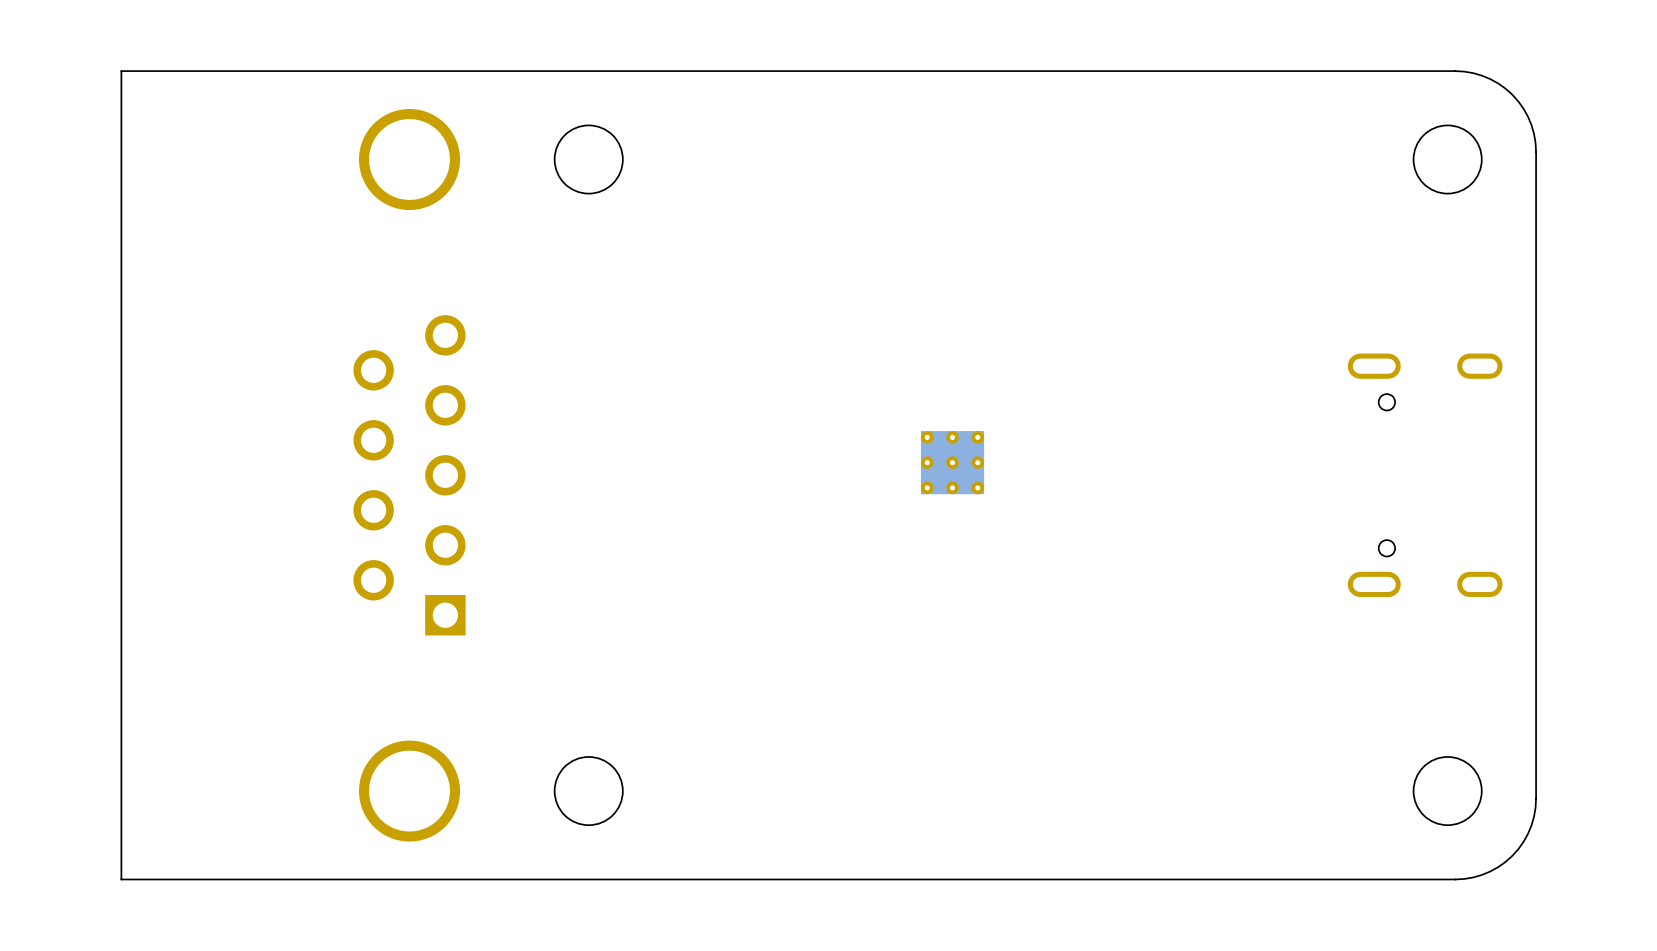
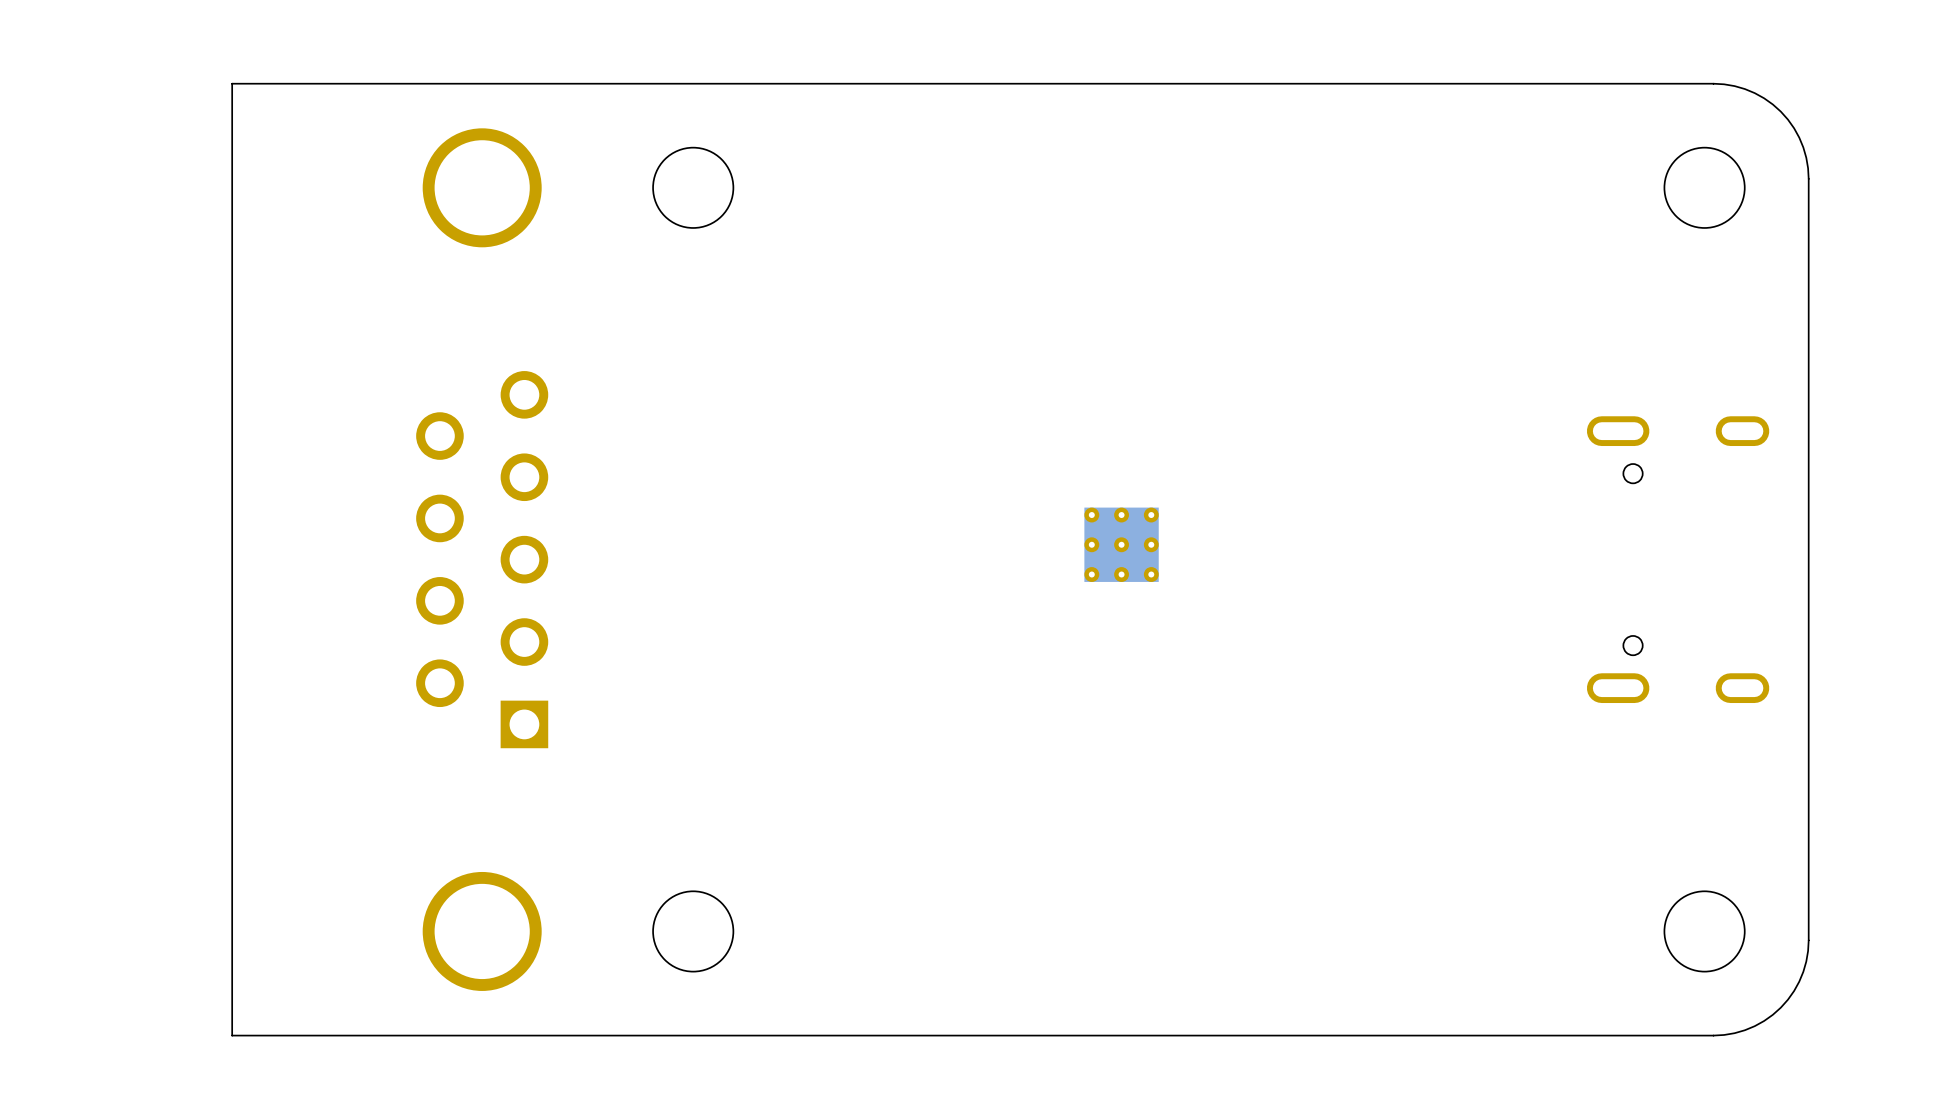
board edge: (197, 71) (121, 71) (121, 879) (197, 879) -> (232, 83) (232, 1035)

